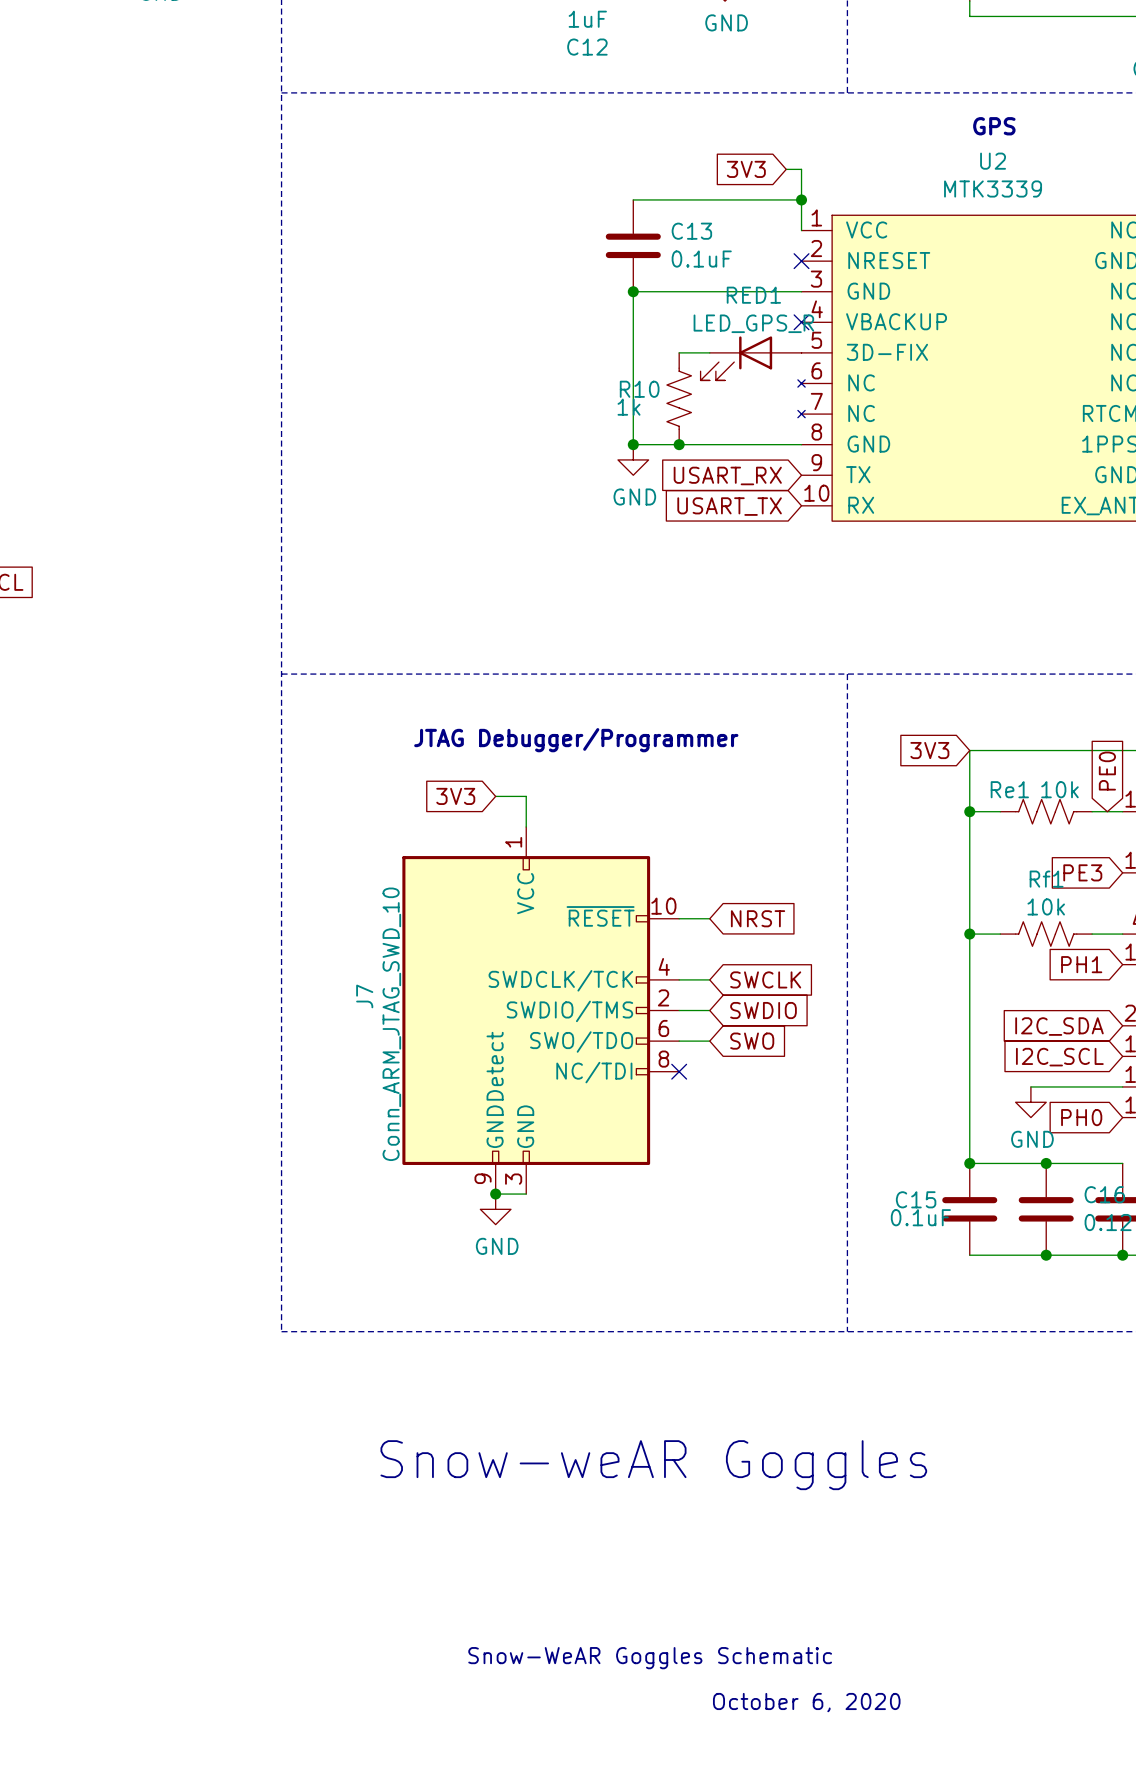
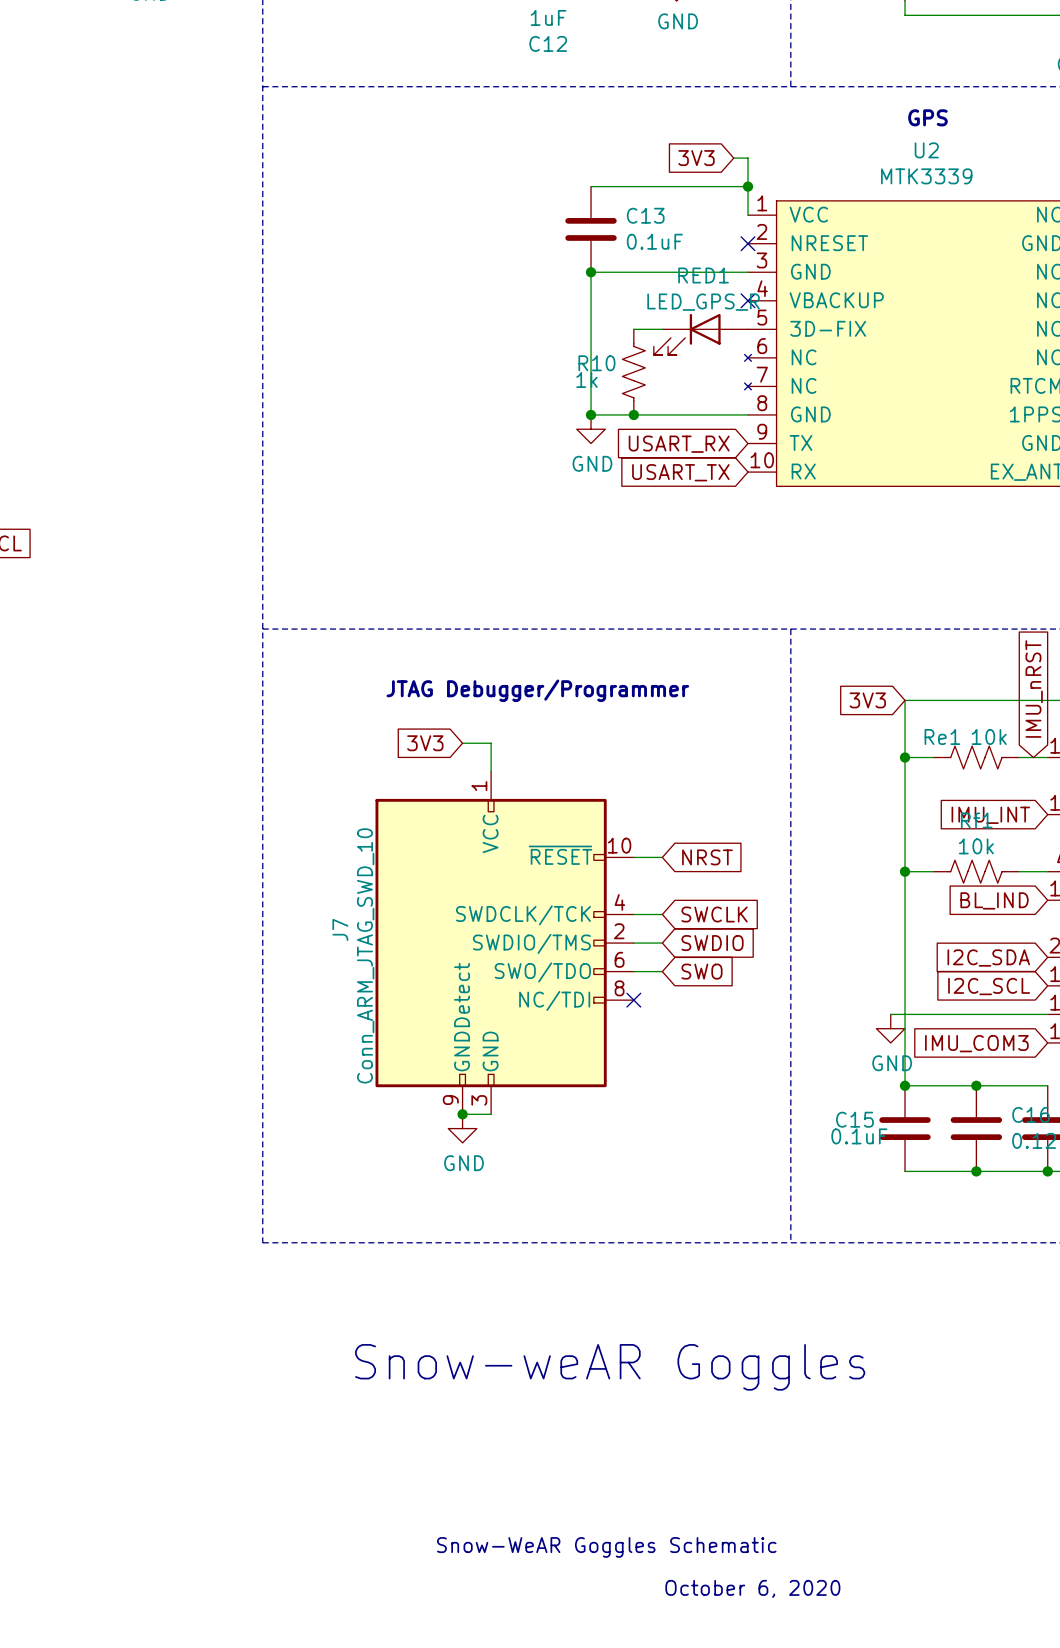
global label: PE0 (1107, 771) -> IMU_nRST (1034, 689)
global label: PE3 (1082, 872) -> IMU_INT (990, 815)
global label: PH1 (1081, 964) -> BL_IND (994, 900)
wire: none -> (890, 1014) (962, 1014)
power symbol position: GND (1030, 1102) -> GND (890, 1028)
global label: PH0 (1081, 1117) -> IMU_COM3 (976, 1043)

